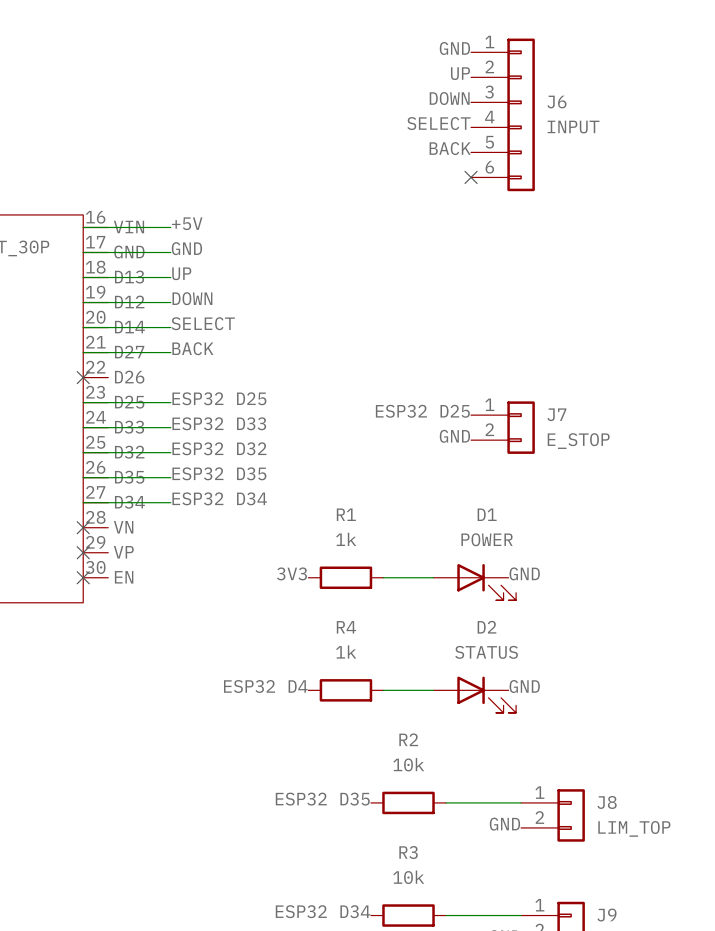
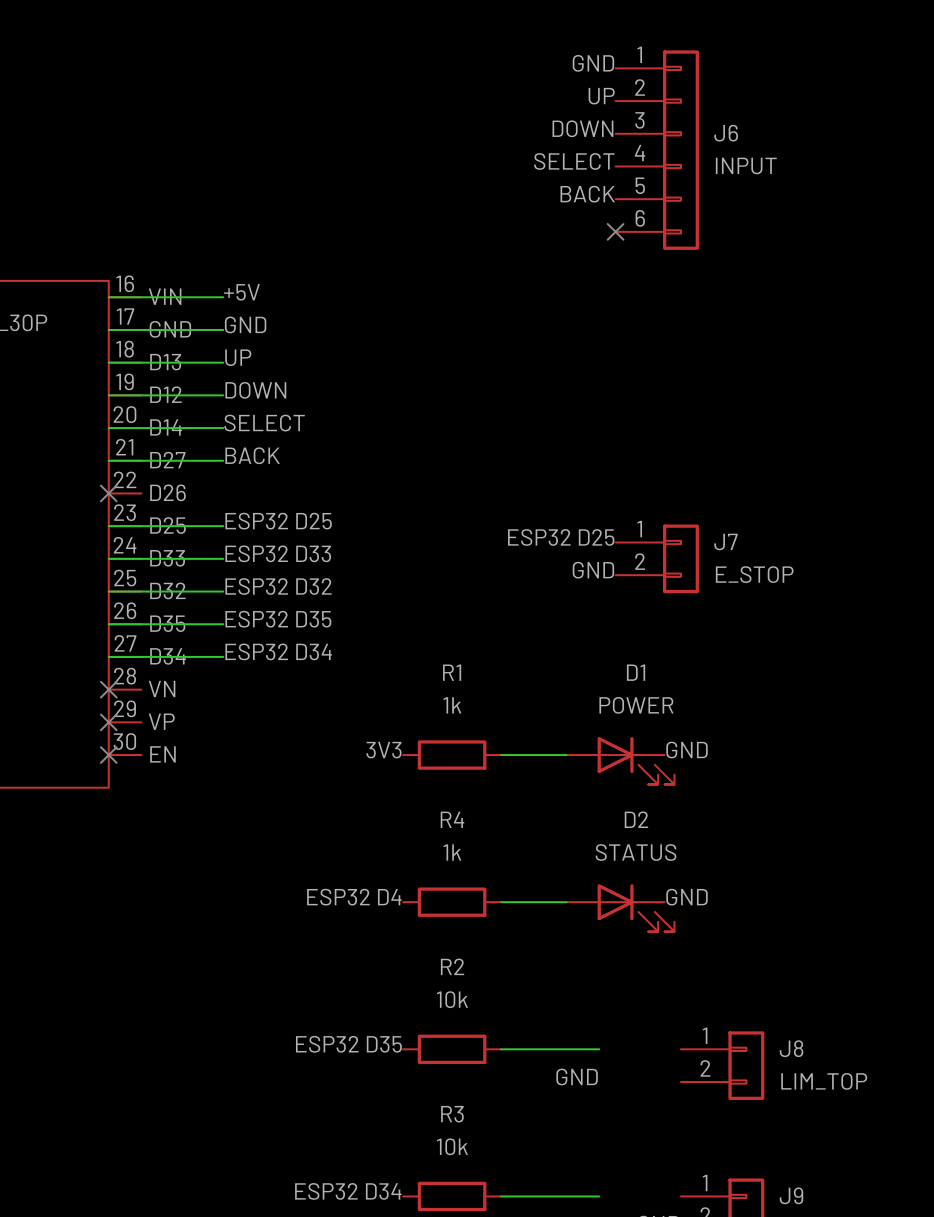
label position: ESP32 D35 (322, 799) -> ESP32 D35 (348, 1044)
R2 position: (408, 802) -> (452, 1049)
wire: (458, 802) (521, 802) -> (501, 1049) (582, 1049)
label position: GND (504, 824) -> GND (577, 1076)
label position: ESP32 D34 (323, 911) -> ESP32 D34 (348, 1191)
R3 position: (408, 915) -> (452, 1196)
wire: (458, 915) (521, 915) -> (501, 1196) (582, 1196)

